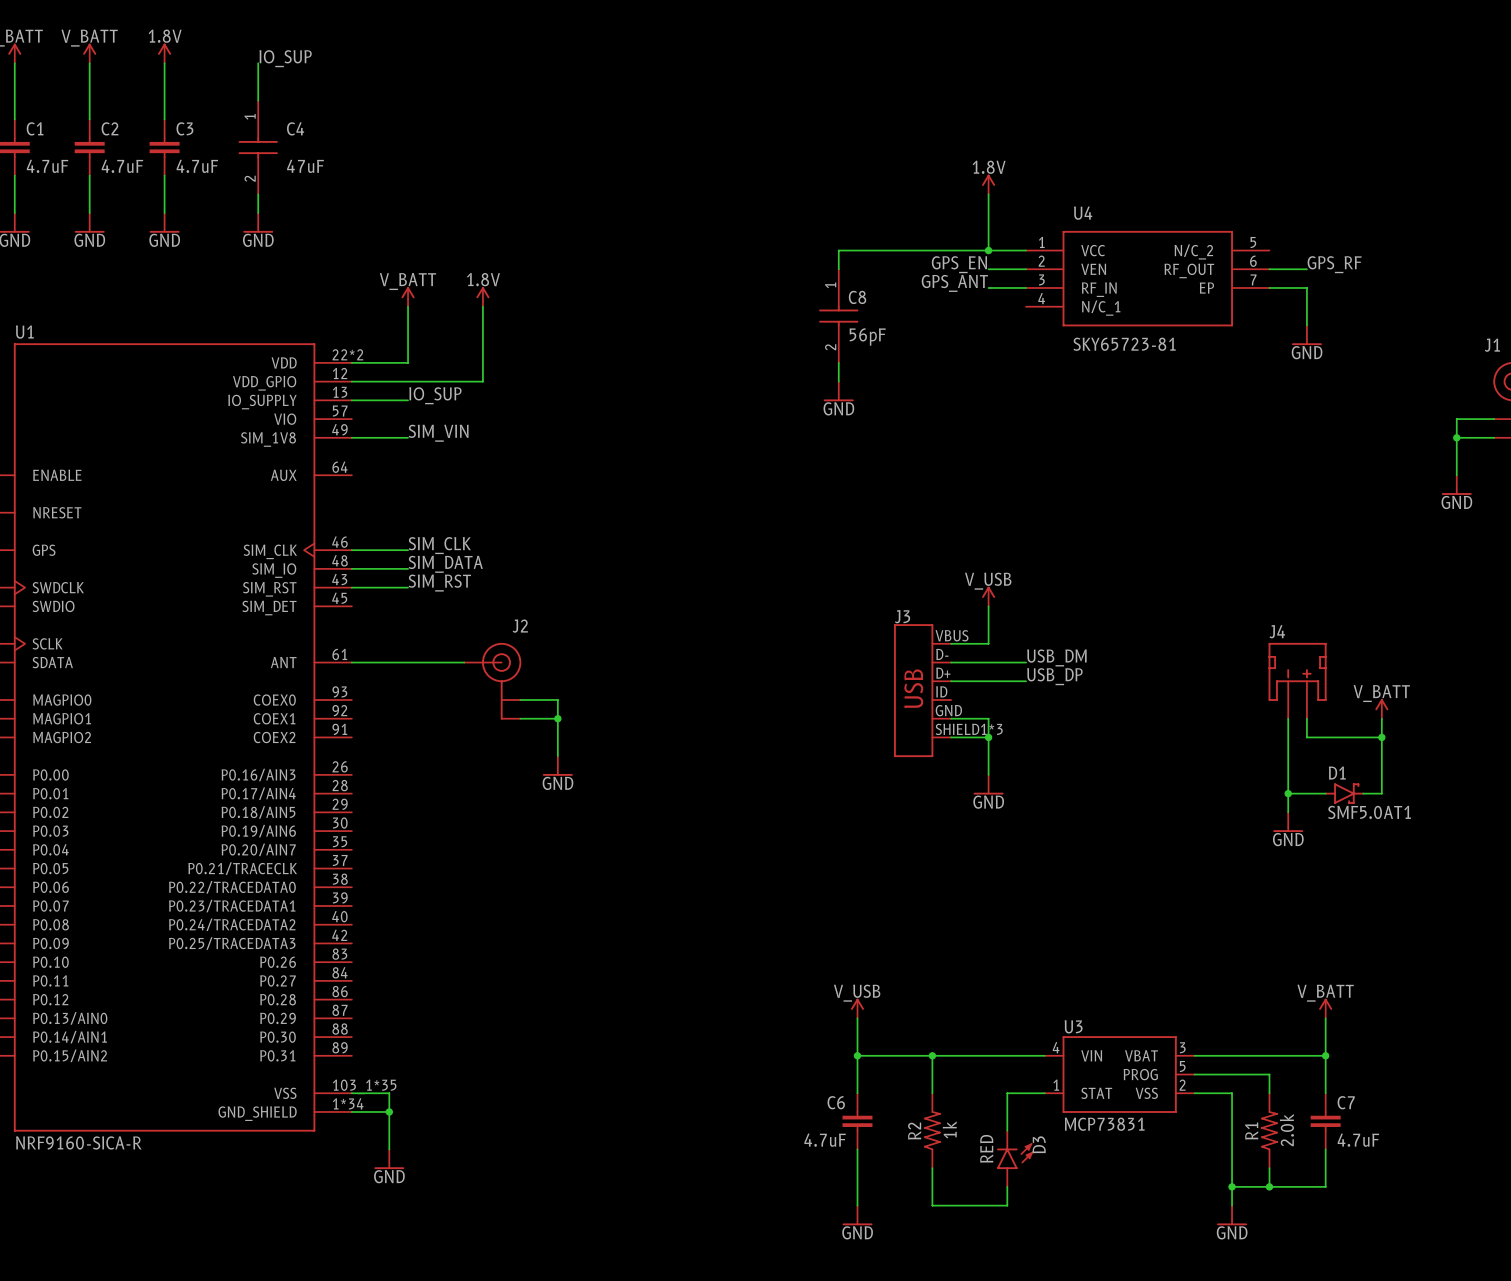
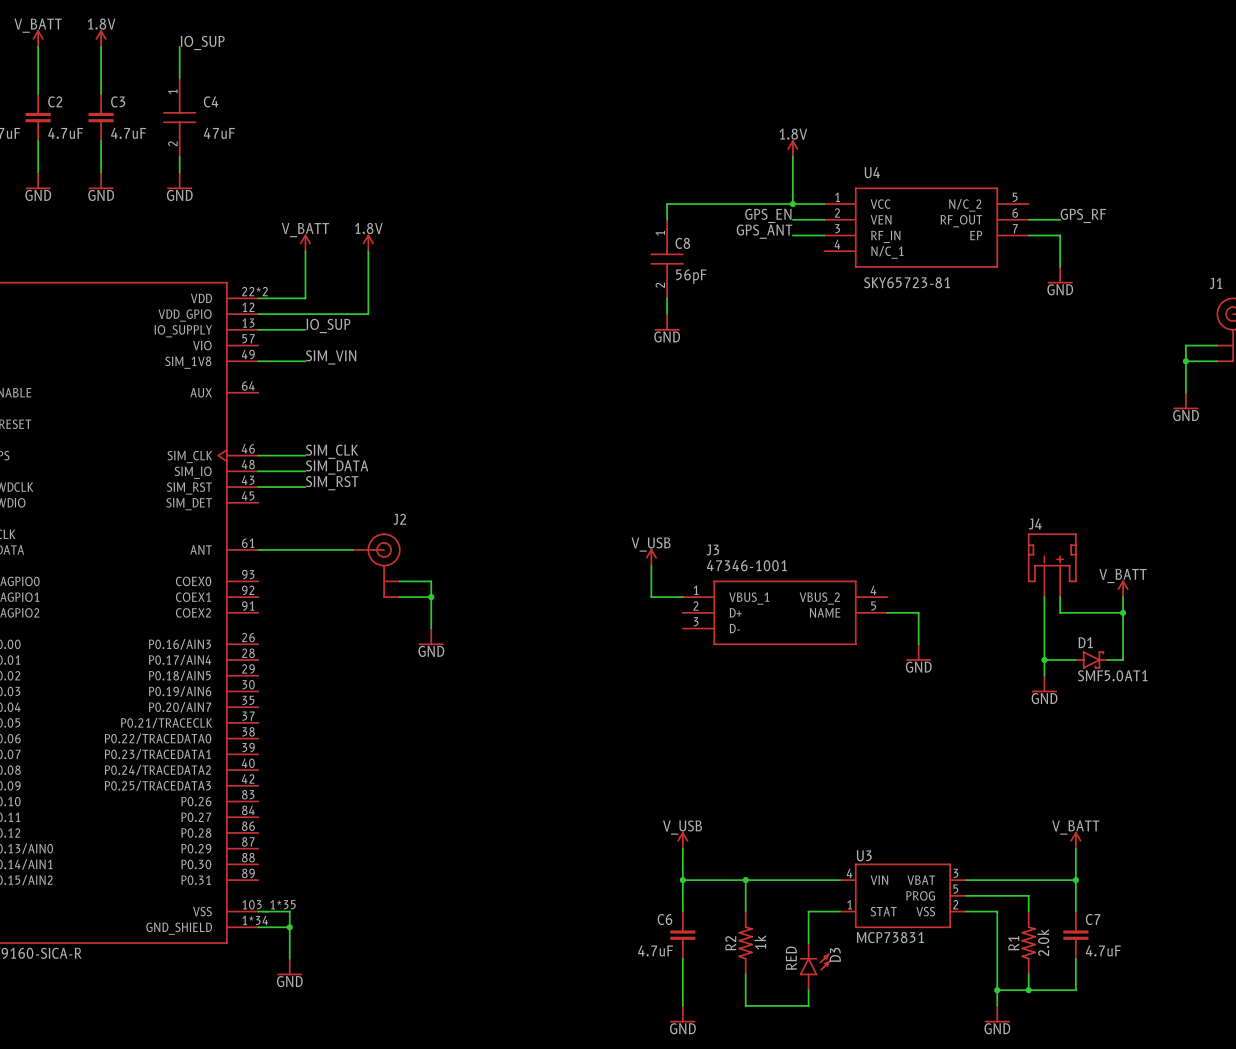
power symbol: V_USB (988, 596) -> none
wire: (988, 606) (988, 643) (951, 643) -> none
J3 name position: J3 (902, 616) -> J3 (712, 550)
J3 symbol: [894, 624, 952, 758] -> [682, 580, 888, 646]
label: USB_DM (1056, 657) -> none
wire: (951, 662) (1026, 662) -> none
power symbol: none -> V_USB (651, 557)
label: USB_DP (1054, 676) -> none
wire: none -> (651, 565) (651, 597) (682, 597)
J3 value: none -> 47346-1001 (746, 565)
wire: (951, 681) (1026, 681) -> none
wire: (951, 718) (988, 718) (988, 774) -> none
wire: (951, 737) (988, 737) -> none
junction: (988, 737) -> none
wire: none -> (887, 612) (918, 612) (918, 644)
power symbol position: GND (988, 784) -> GND (918, 652)

